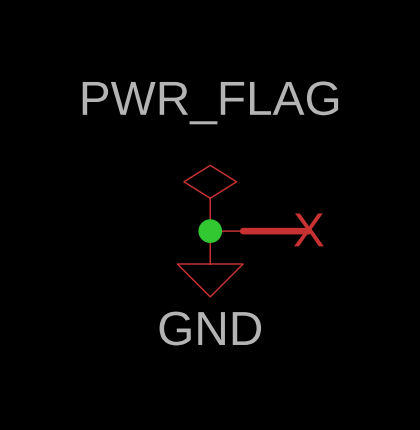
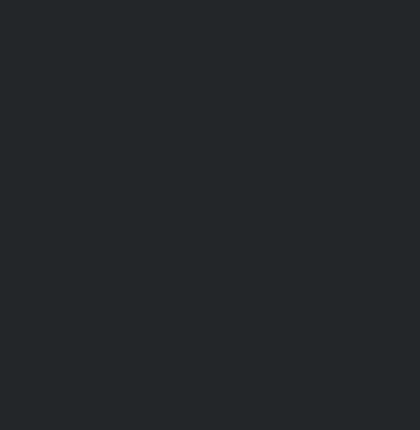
power symbol: PWR_FLAG (210, 198) -> none
junction: (210, 231) -> none
part: (261, 231) -> none
power symbol: GND (210, 264) -> none

